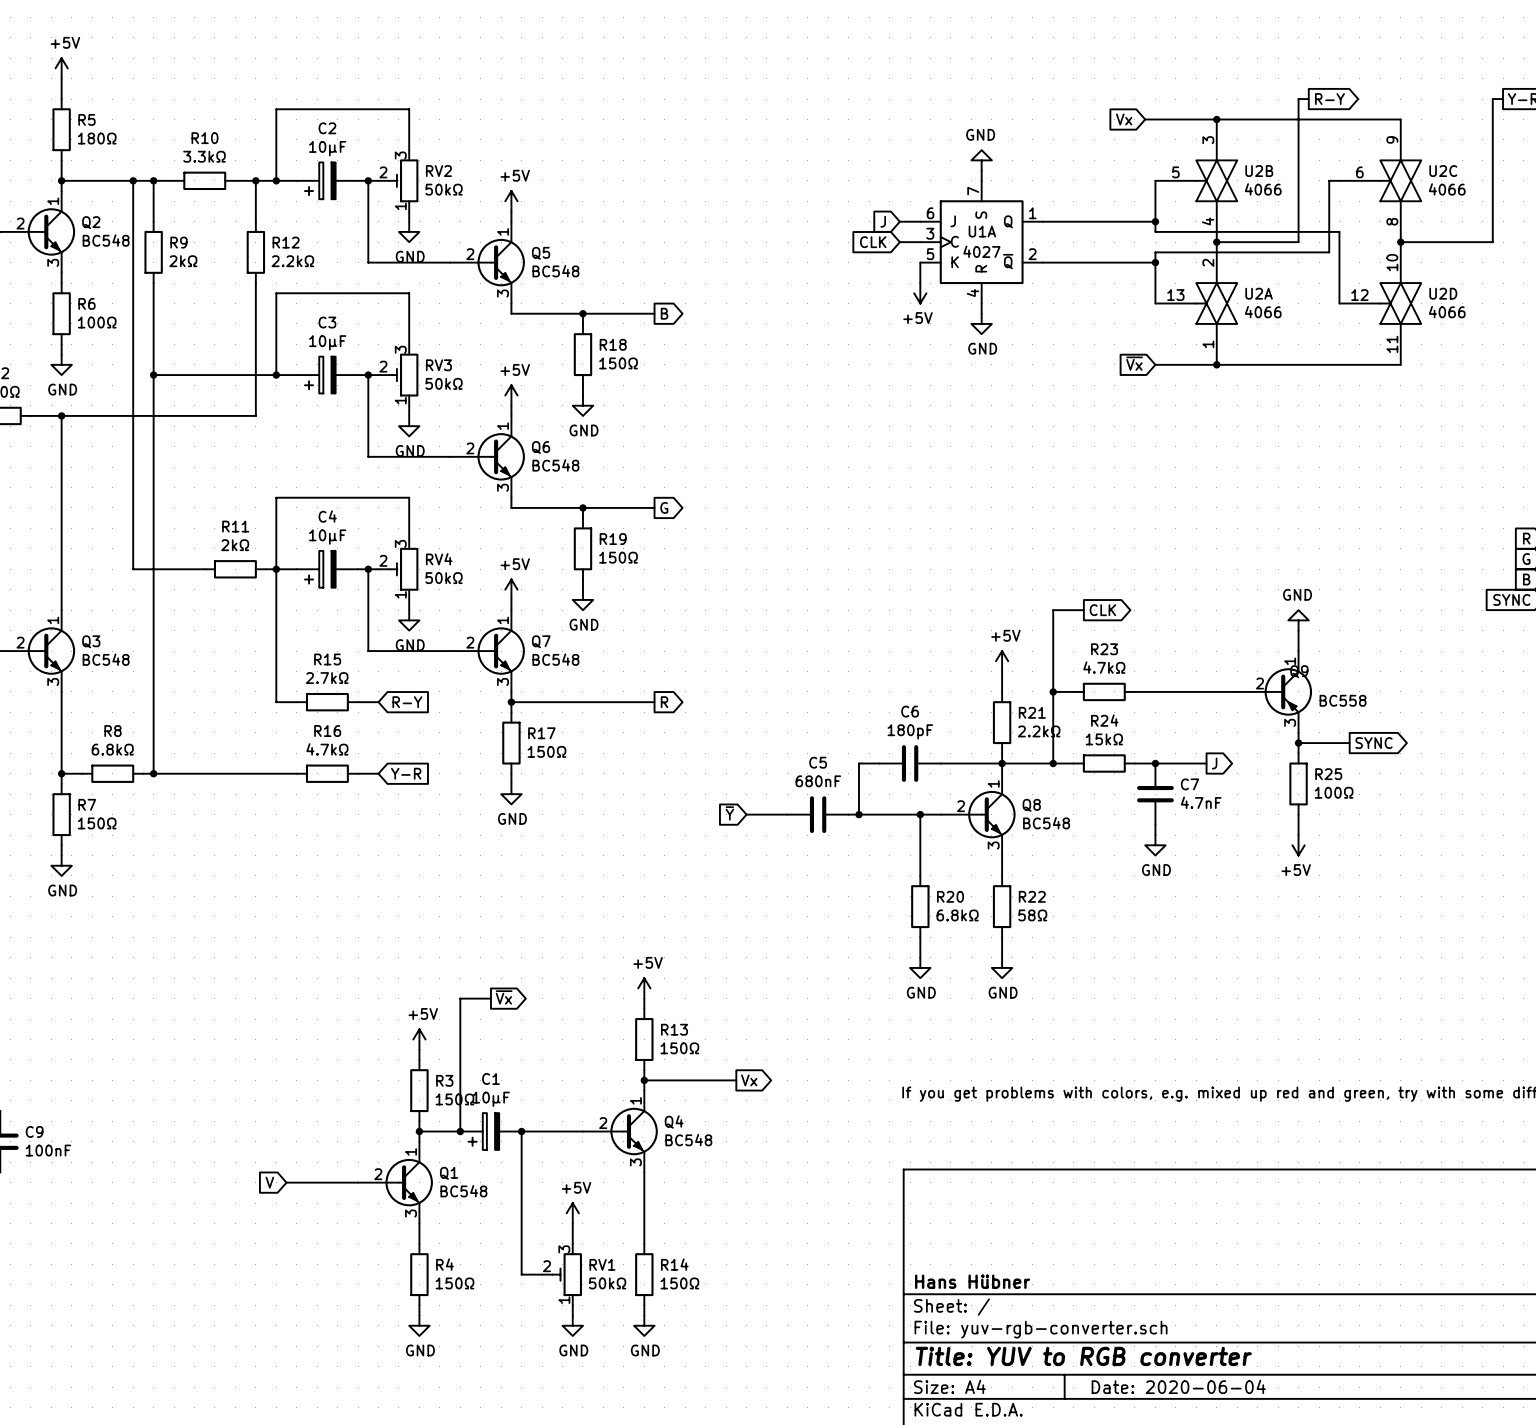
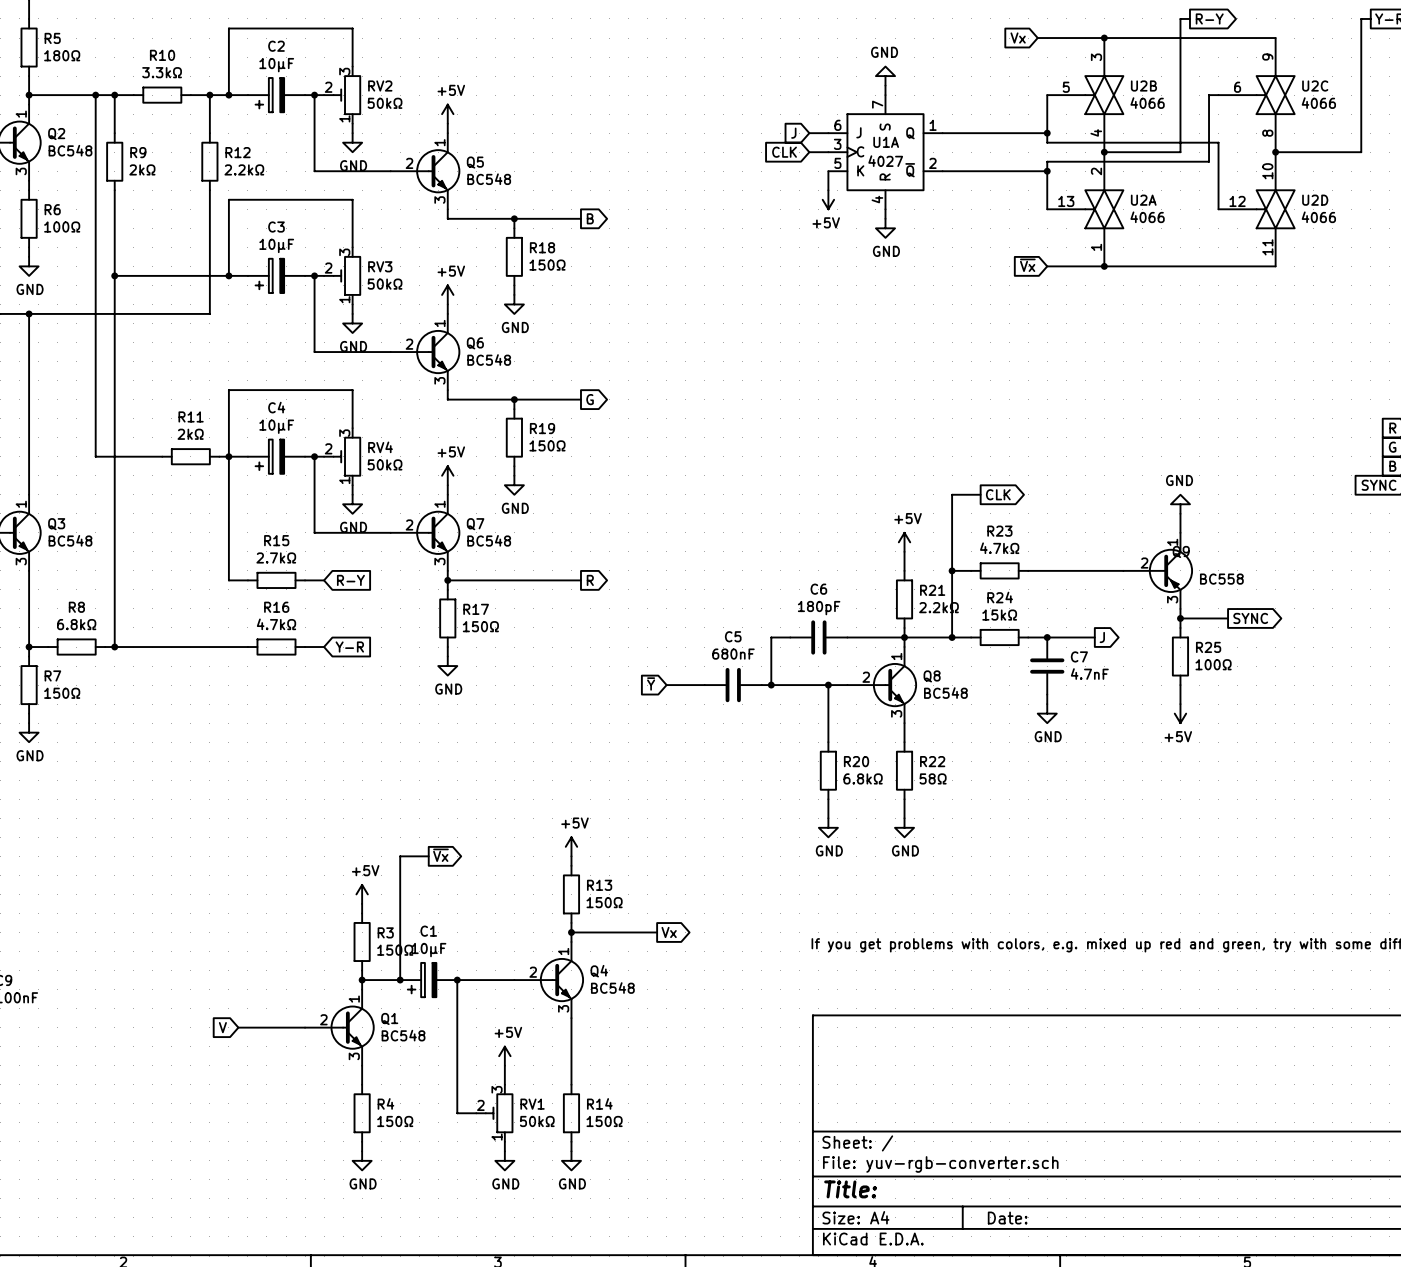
title block: Hans Hübner (972, 1281) -> none
title block: Title: YUV to RGB converter (1083, 1356) -> Title: (850, 1189)
title block: Date: 2020-06-04 (1178, 1386) -> Date: (1007, 1218)

